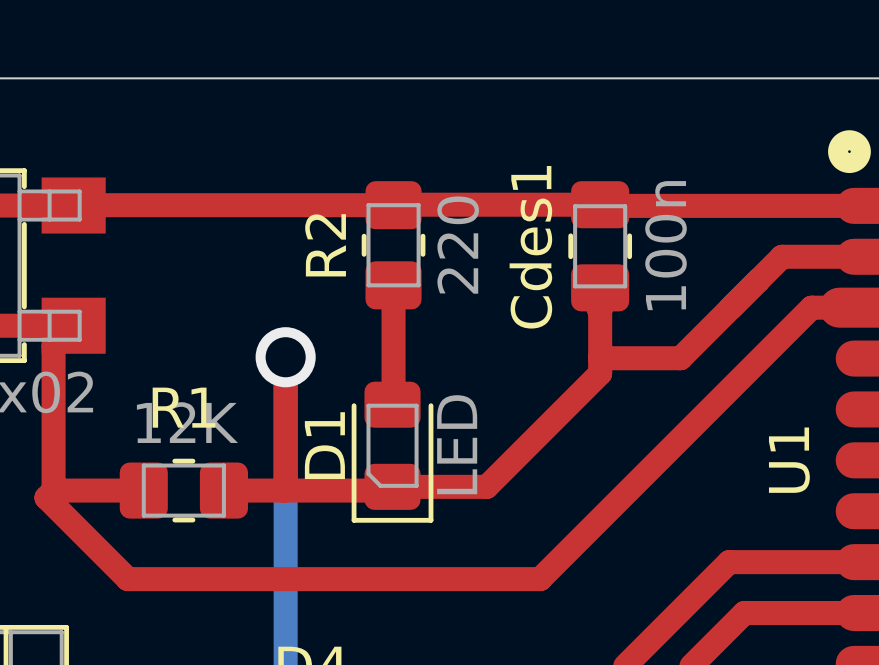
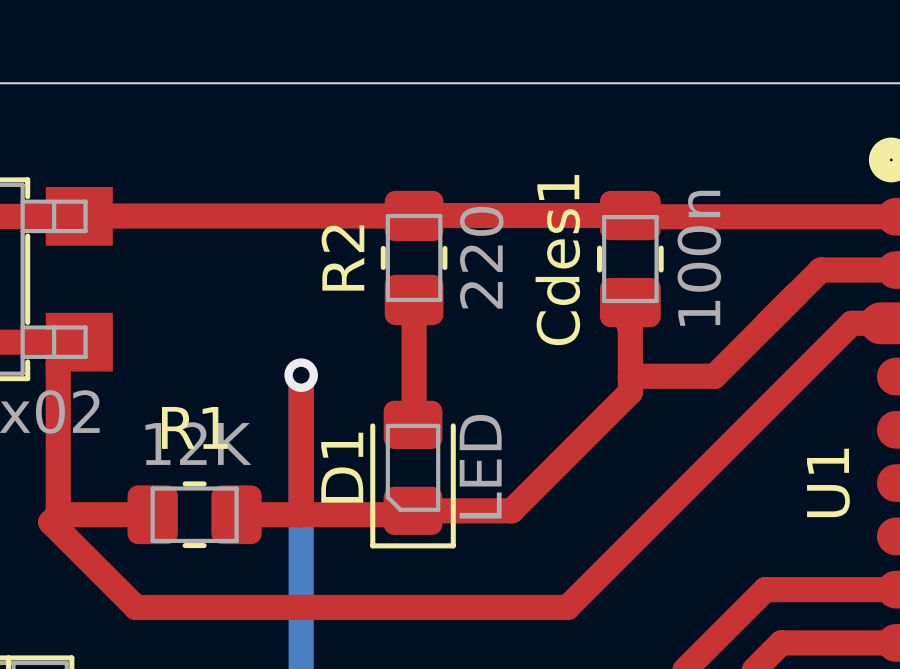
via size: [255, 327, 316, 388] -> [284, 358, 318, 392]

